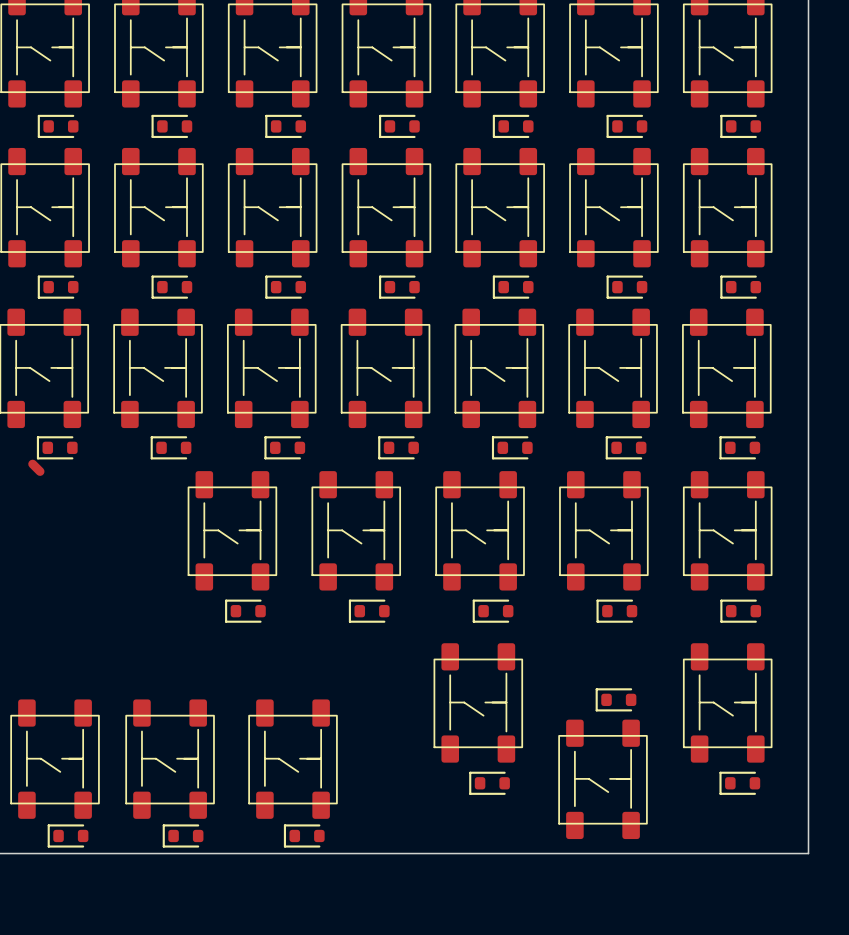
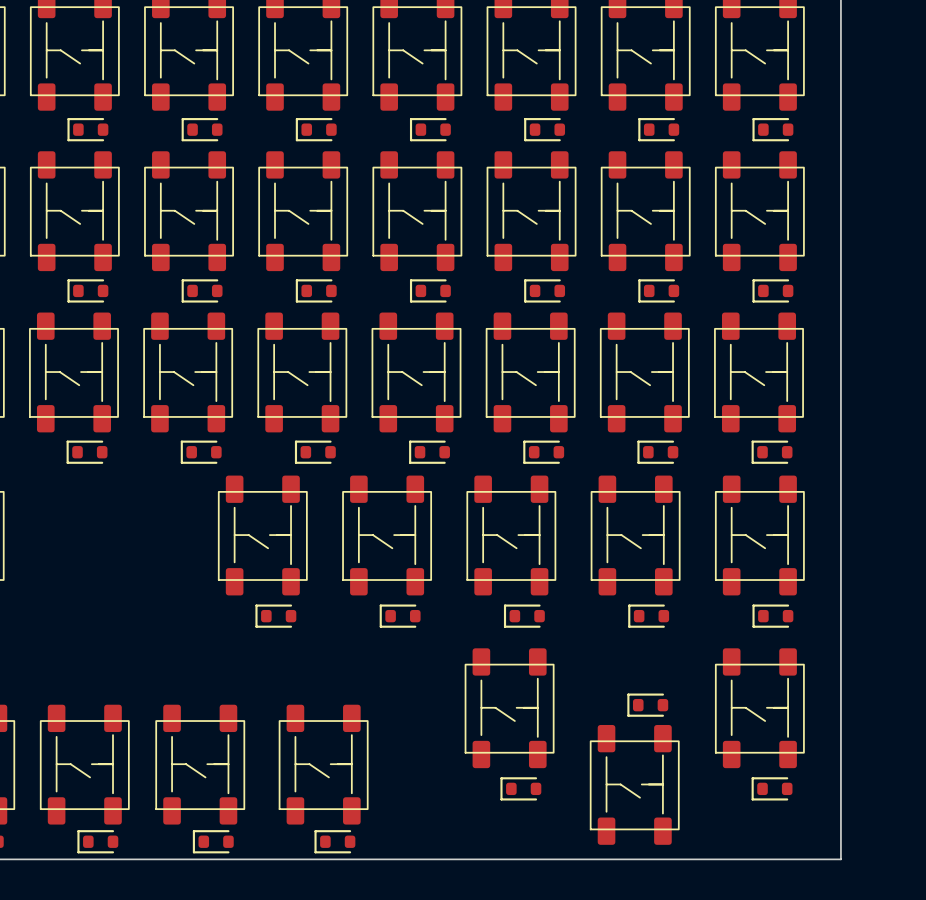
top track: (32, 464) (40, 471) -> none

